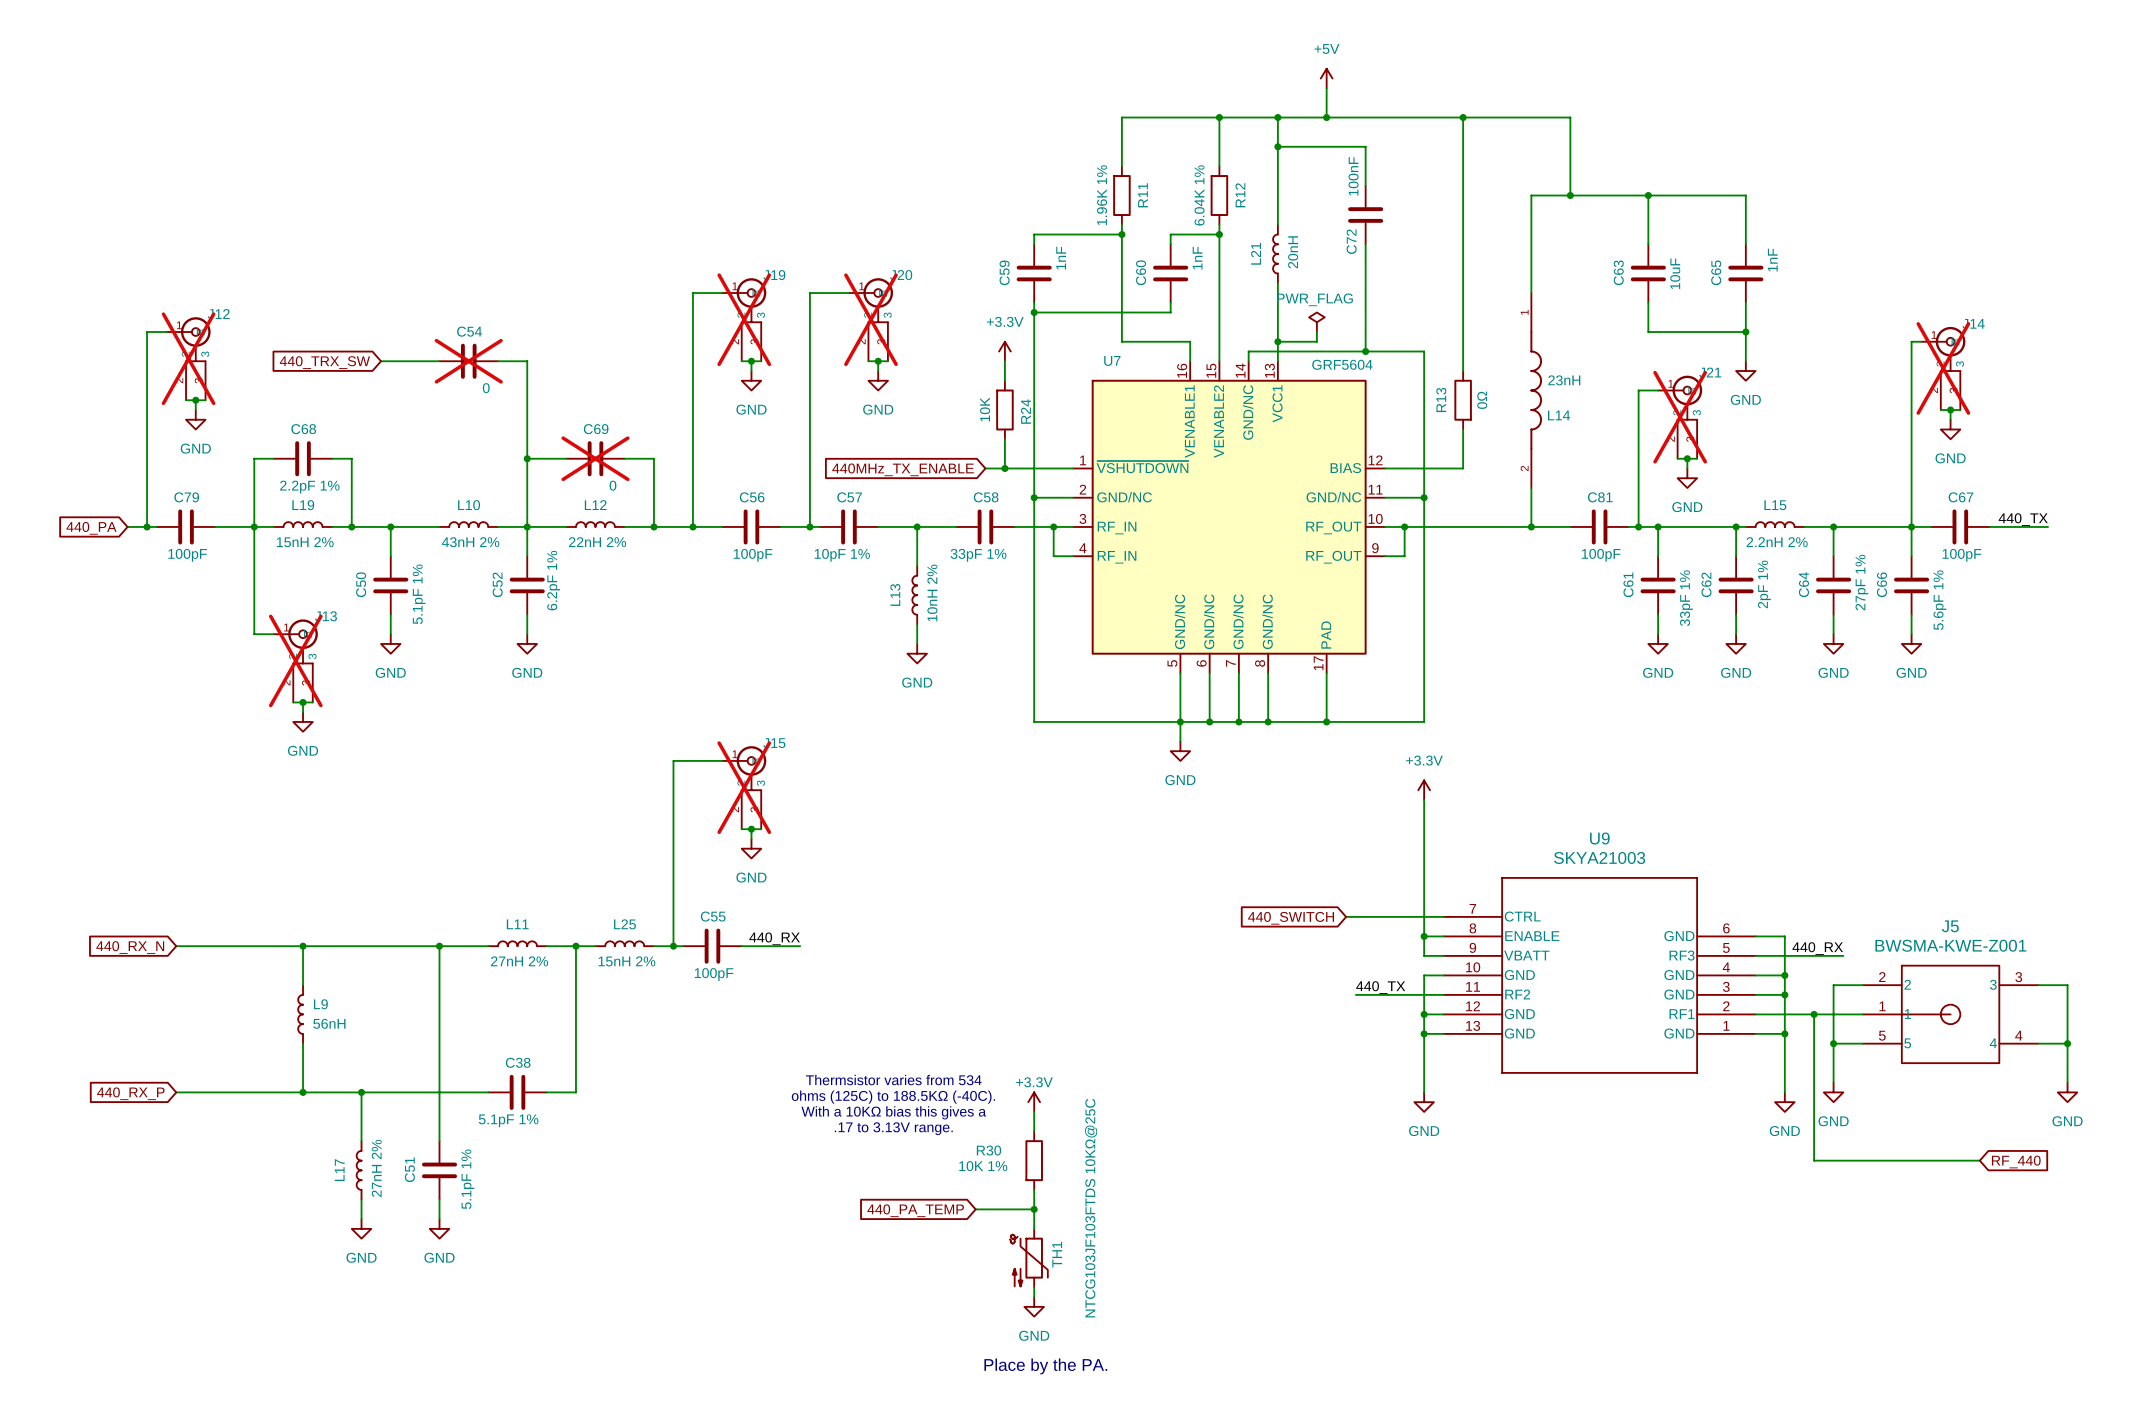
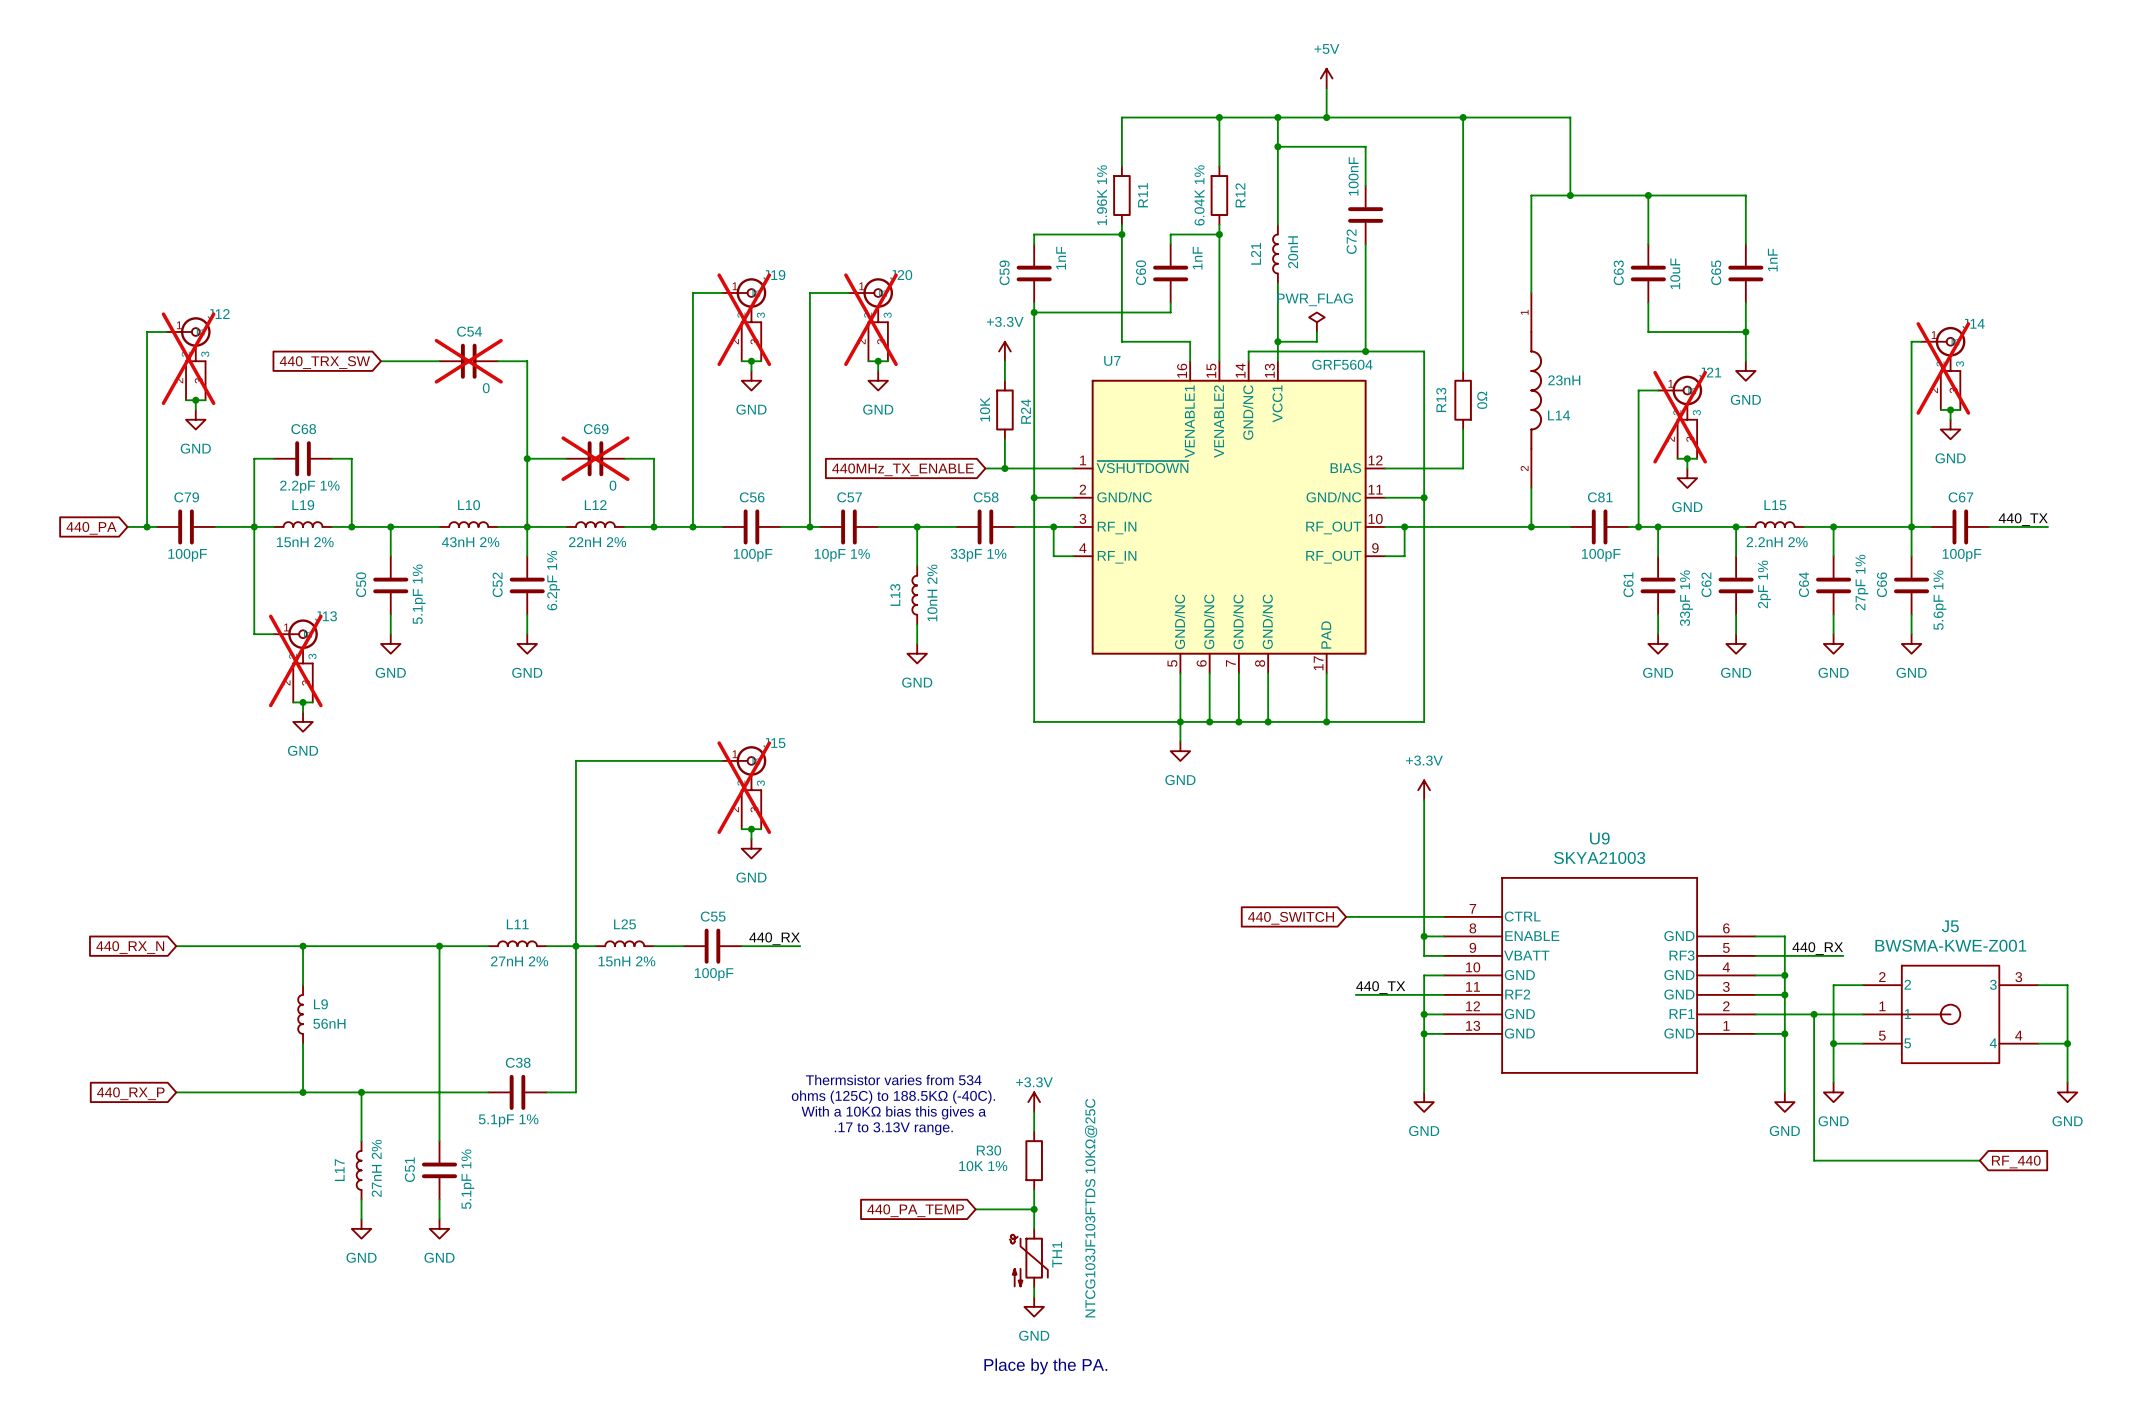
wire: (673, 760) (673, 946) -> (673, 760) (575, 760) (575, 946)
junction: (673, 946) -> none

